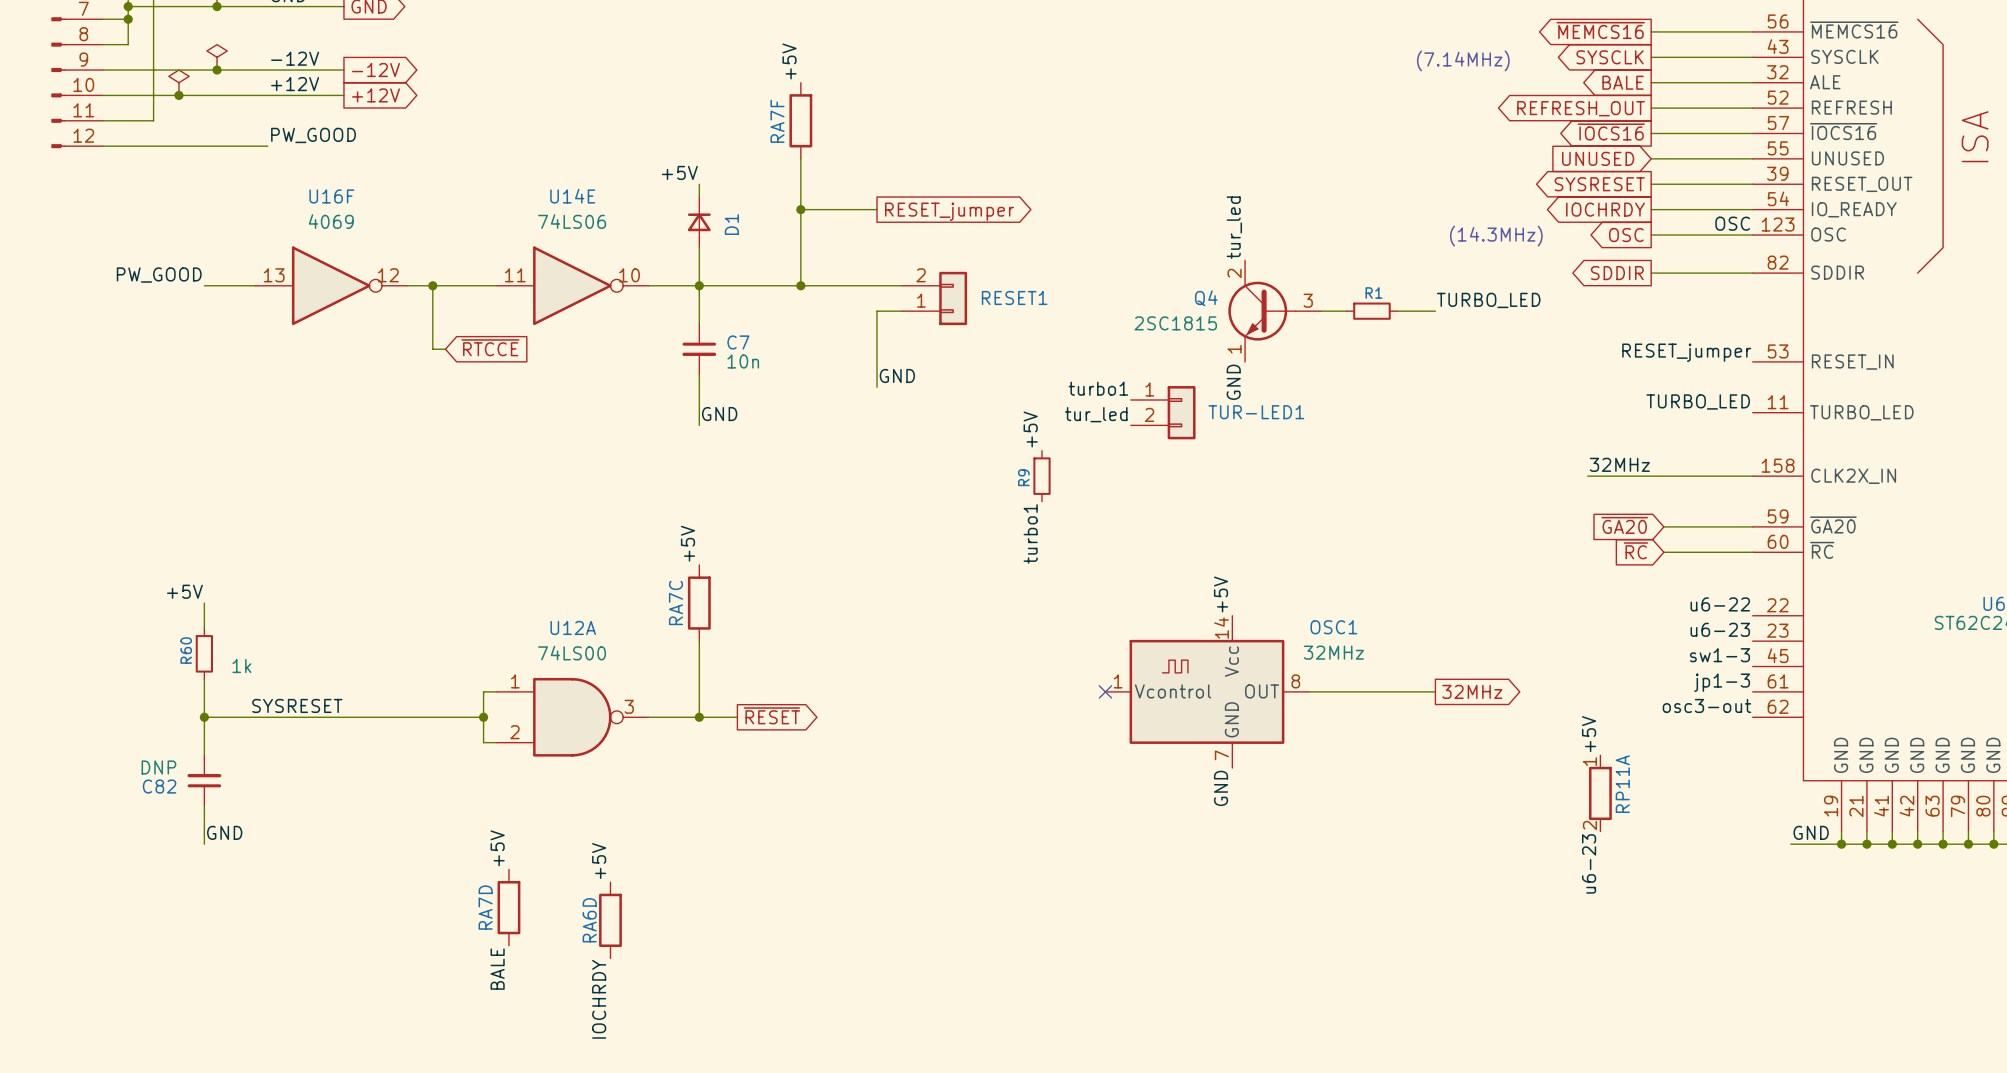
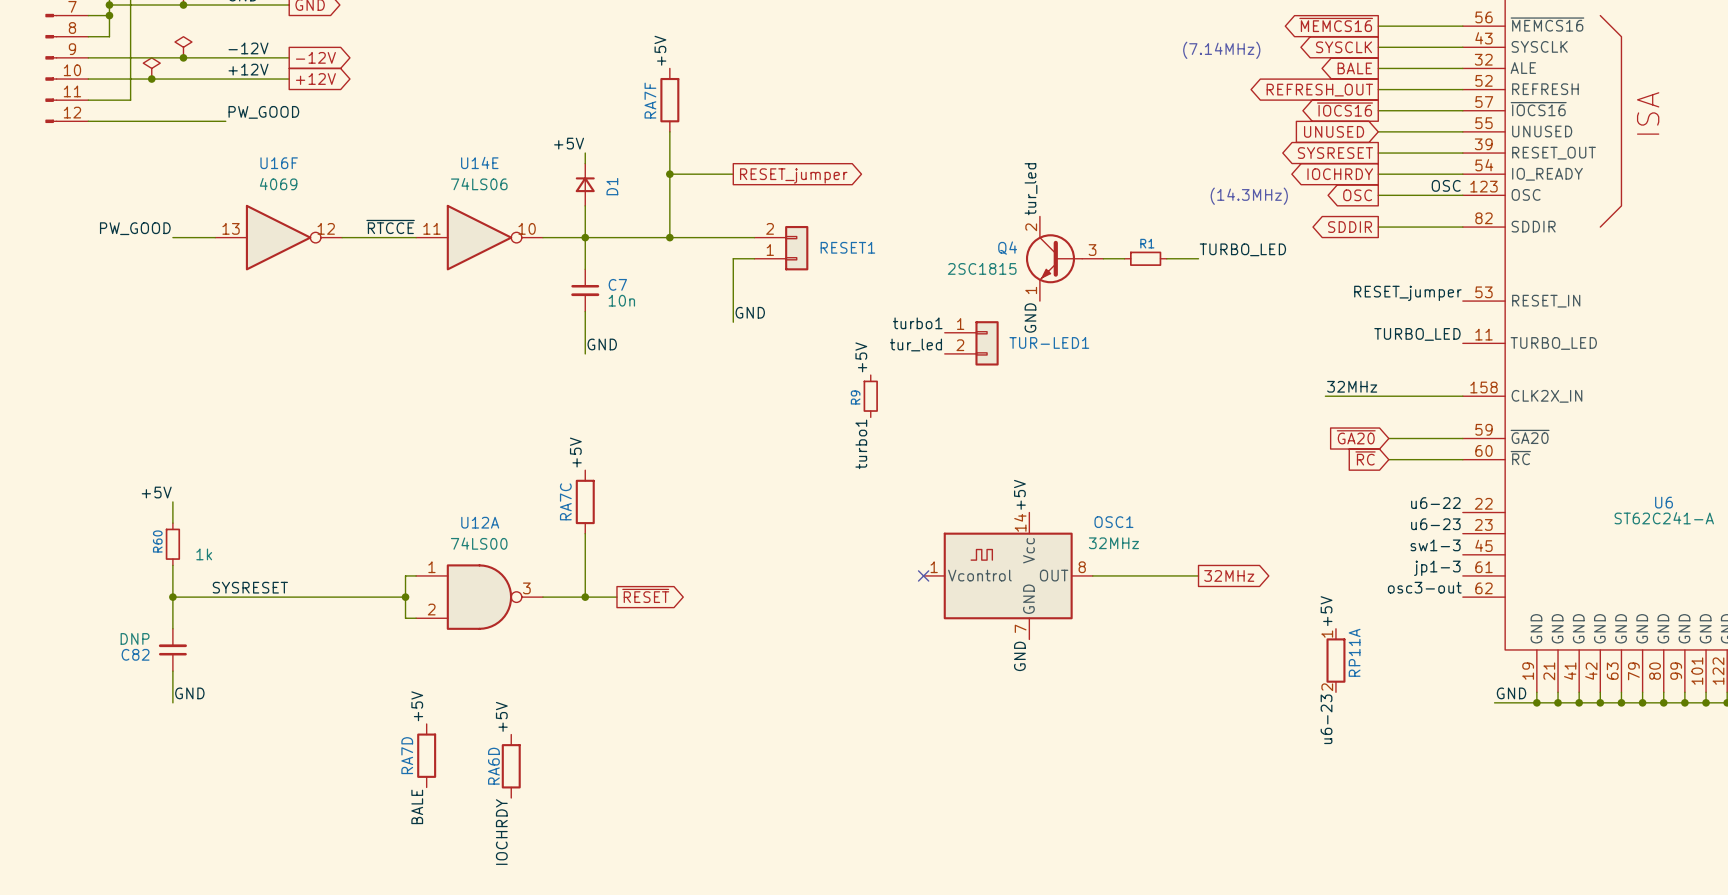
label: none -> ~{RTCCE} (390, 226)
wire: (432, 285) (432, 349) (445, 349) -> none
junction: (432, 285) -> none
global label: ~{RTCCE} (490, 347) -> none

